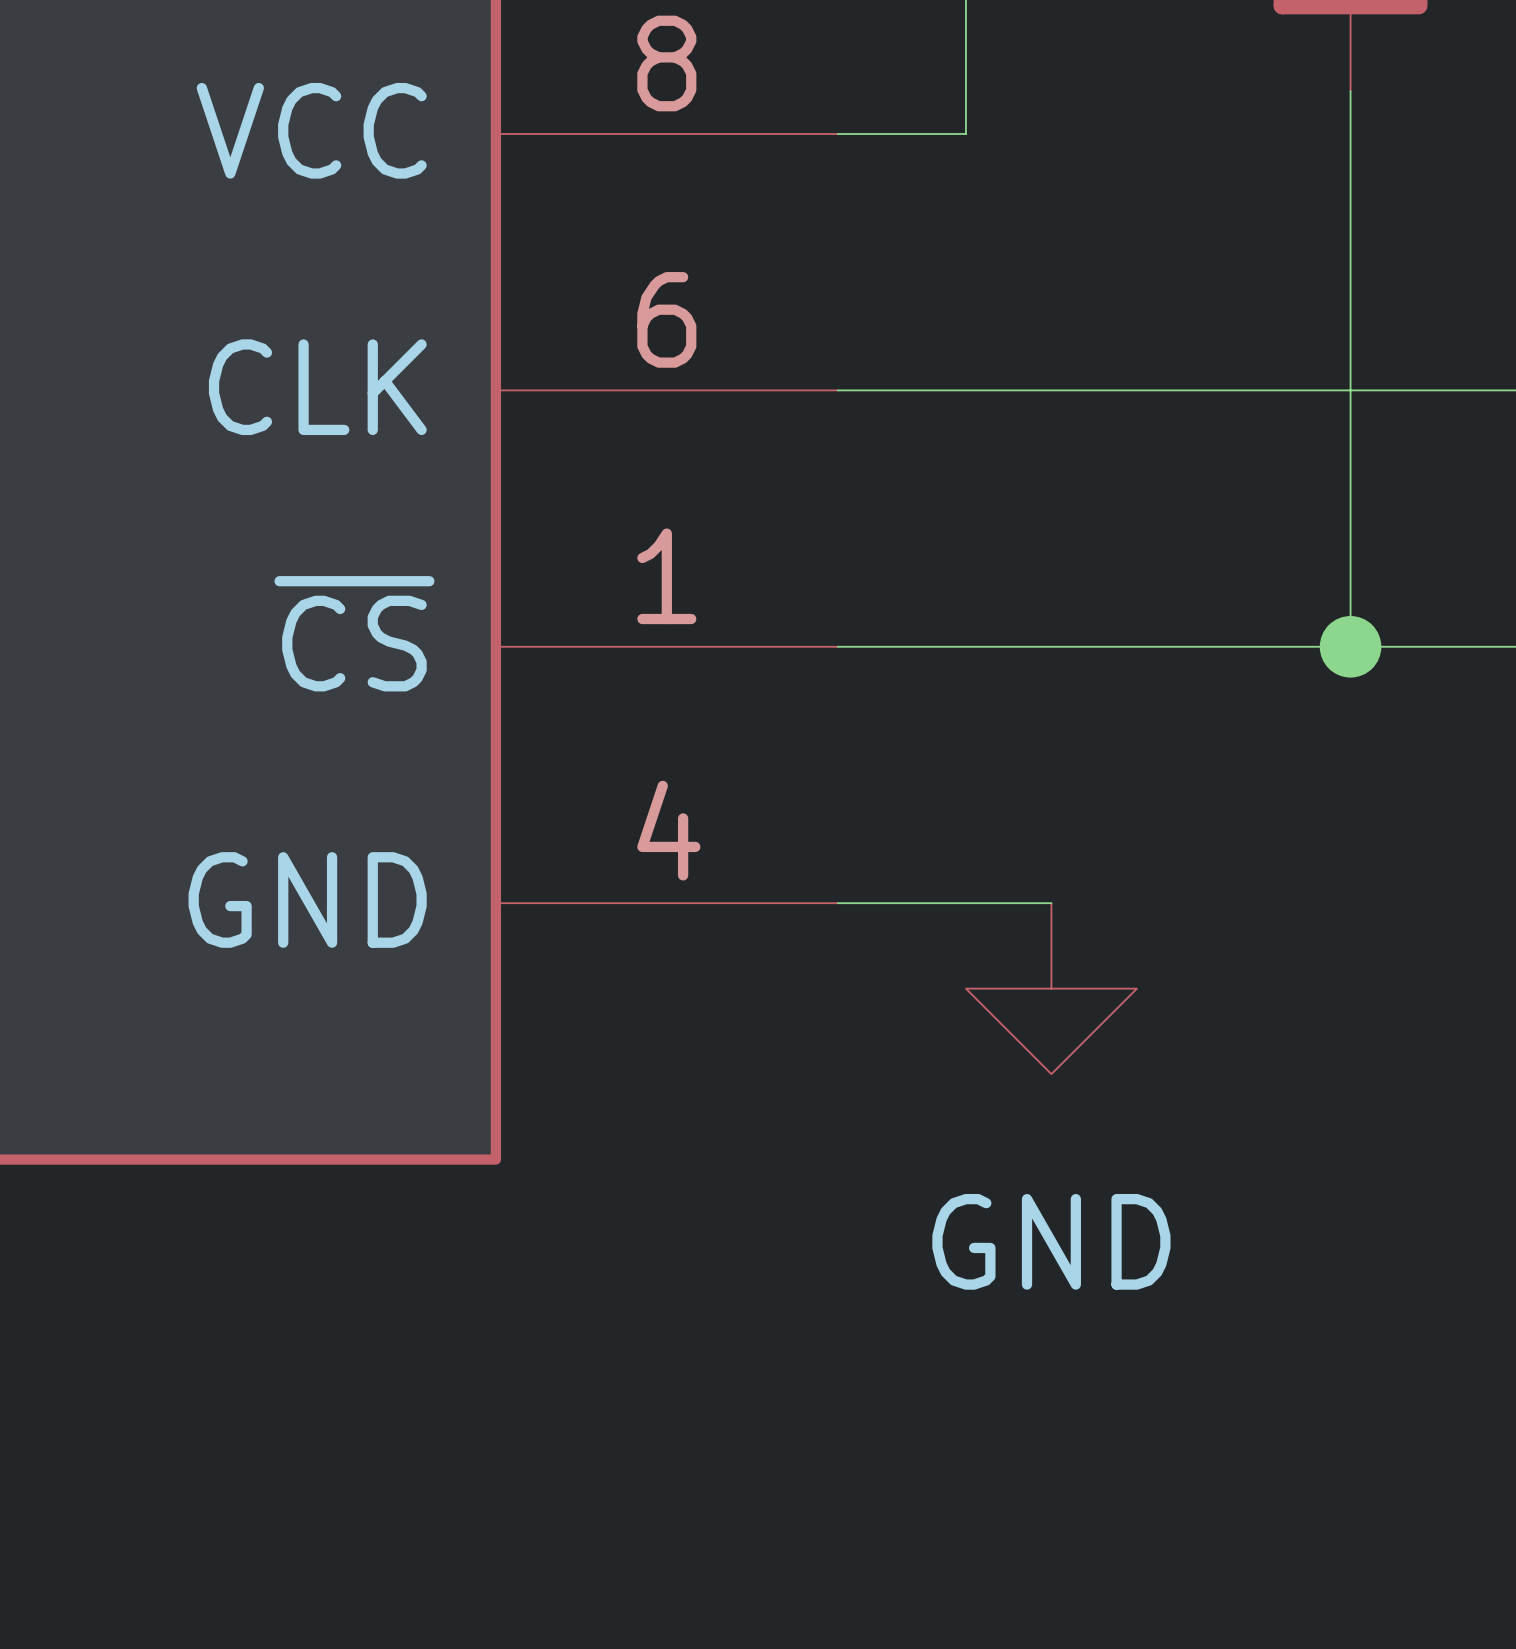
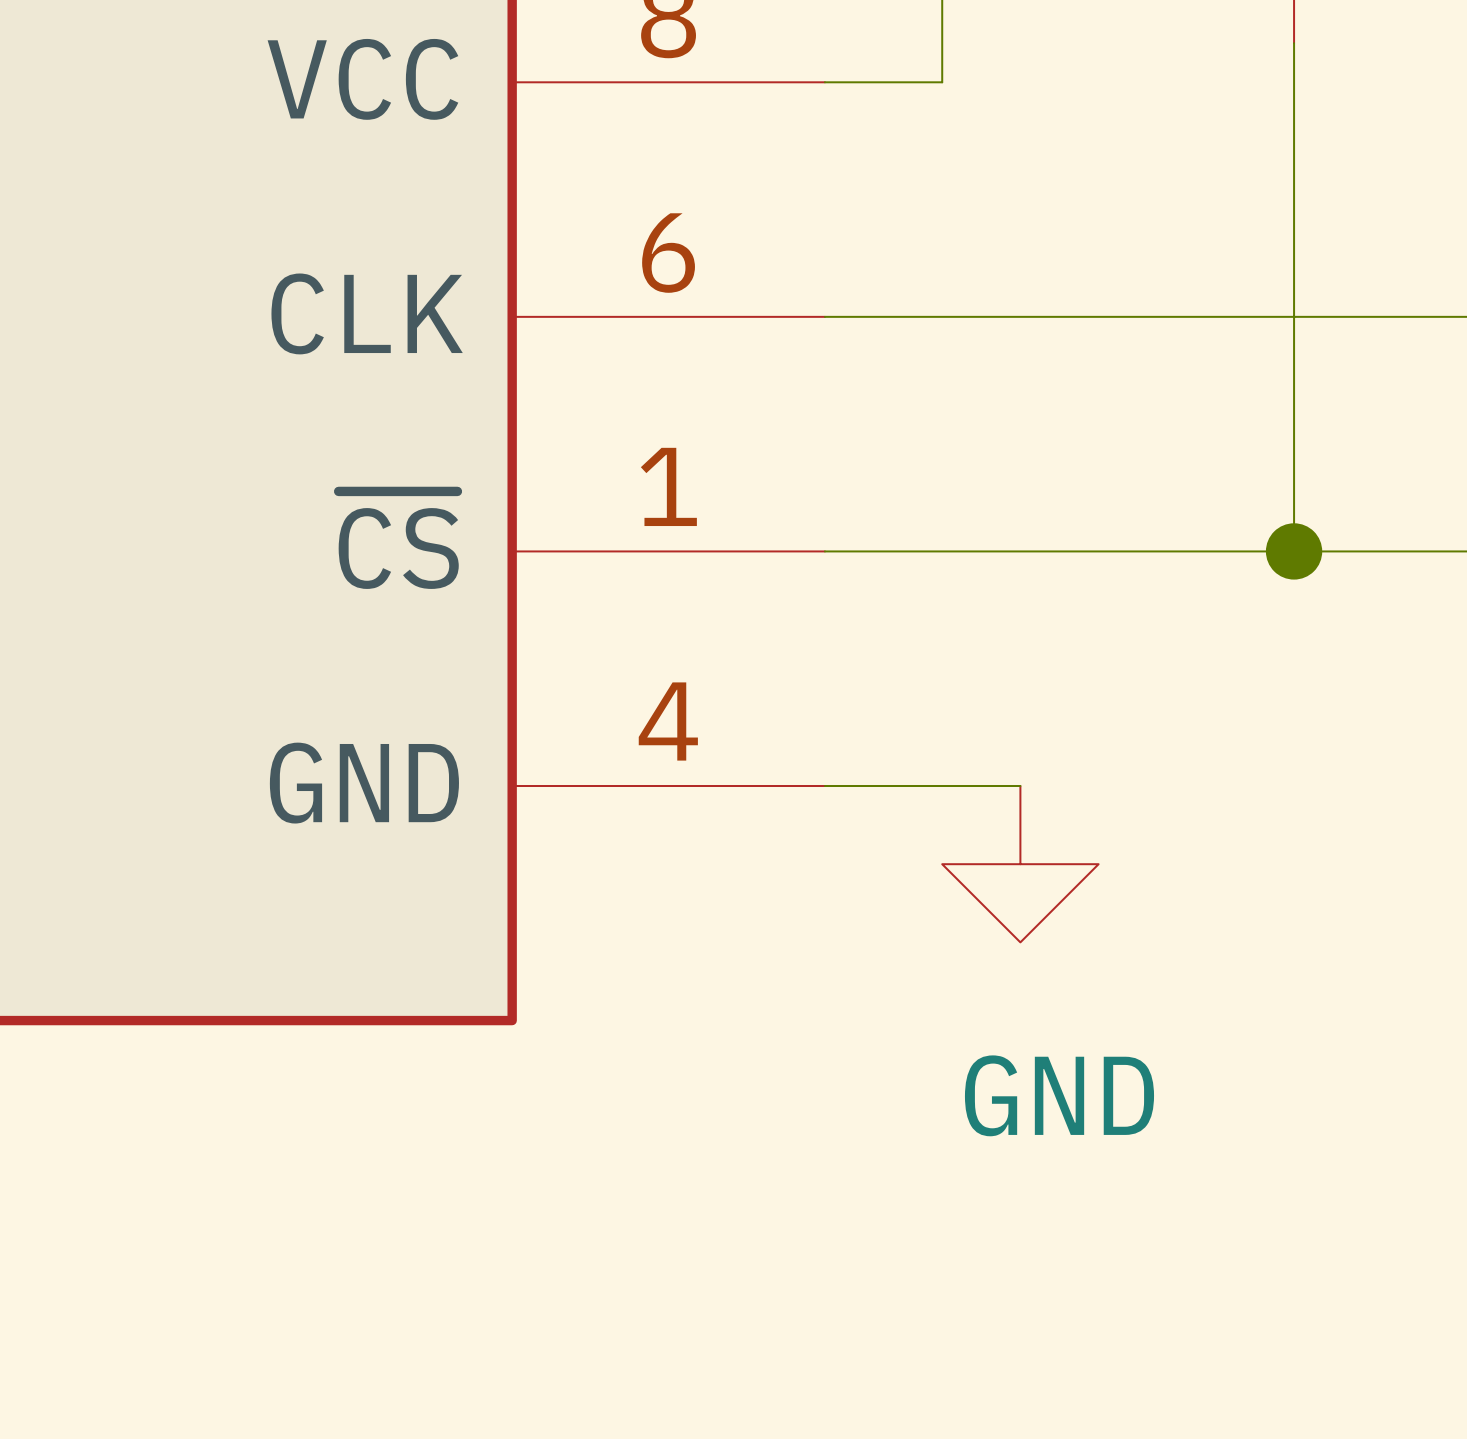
power symbol text position: GND (1051, 1241) -> GND (1059, 1095)

